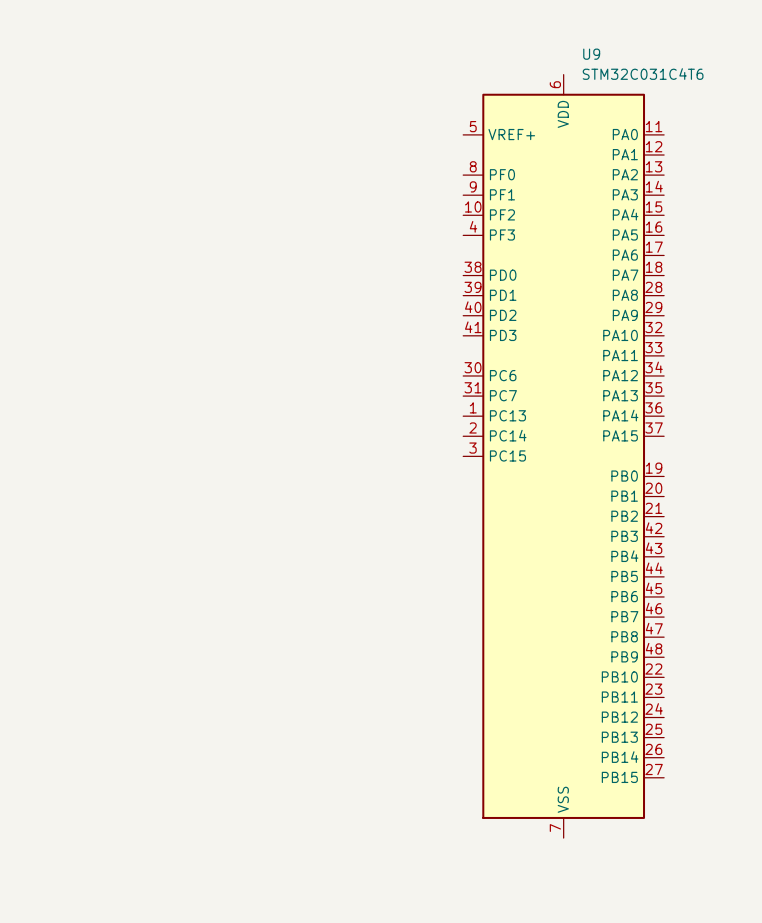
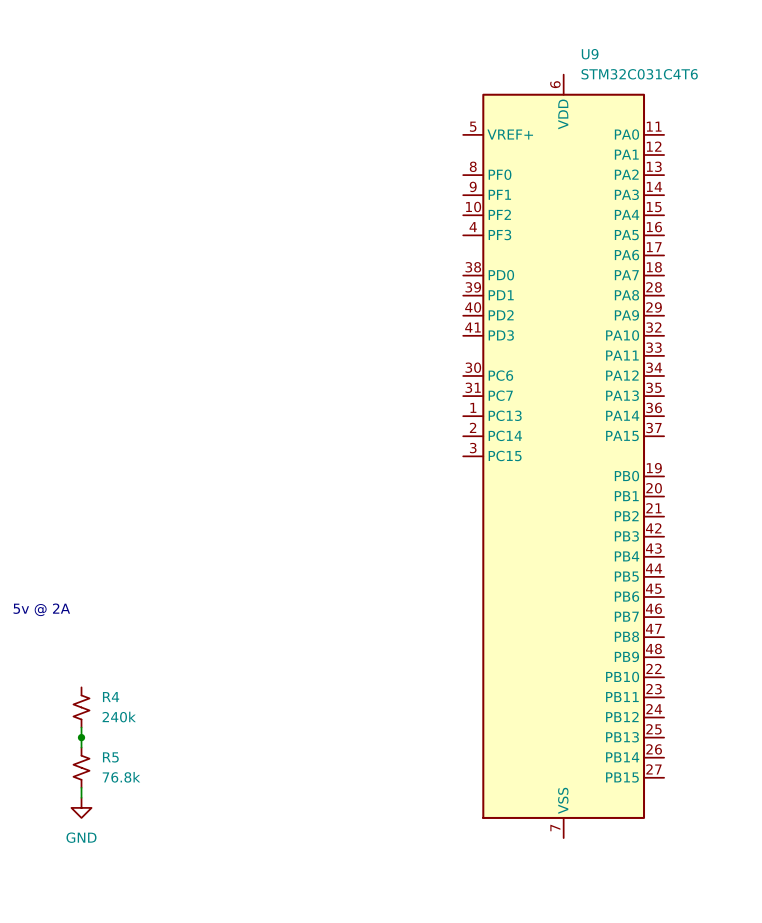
text: none -> 5v @ 2A (41, 609)
R4: none -> 240k (81, 707)
wire: none -> (81, 727) (81, 747)
junction: none -> (81, 737)
R5: none -> 76.8k (81, 767)
wire: none -> (81, 787) (81, 797)
power symbol: none -> GND (81, 807)

